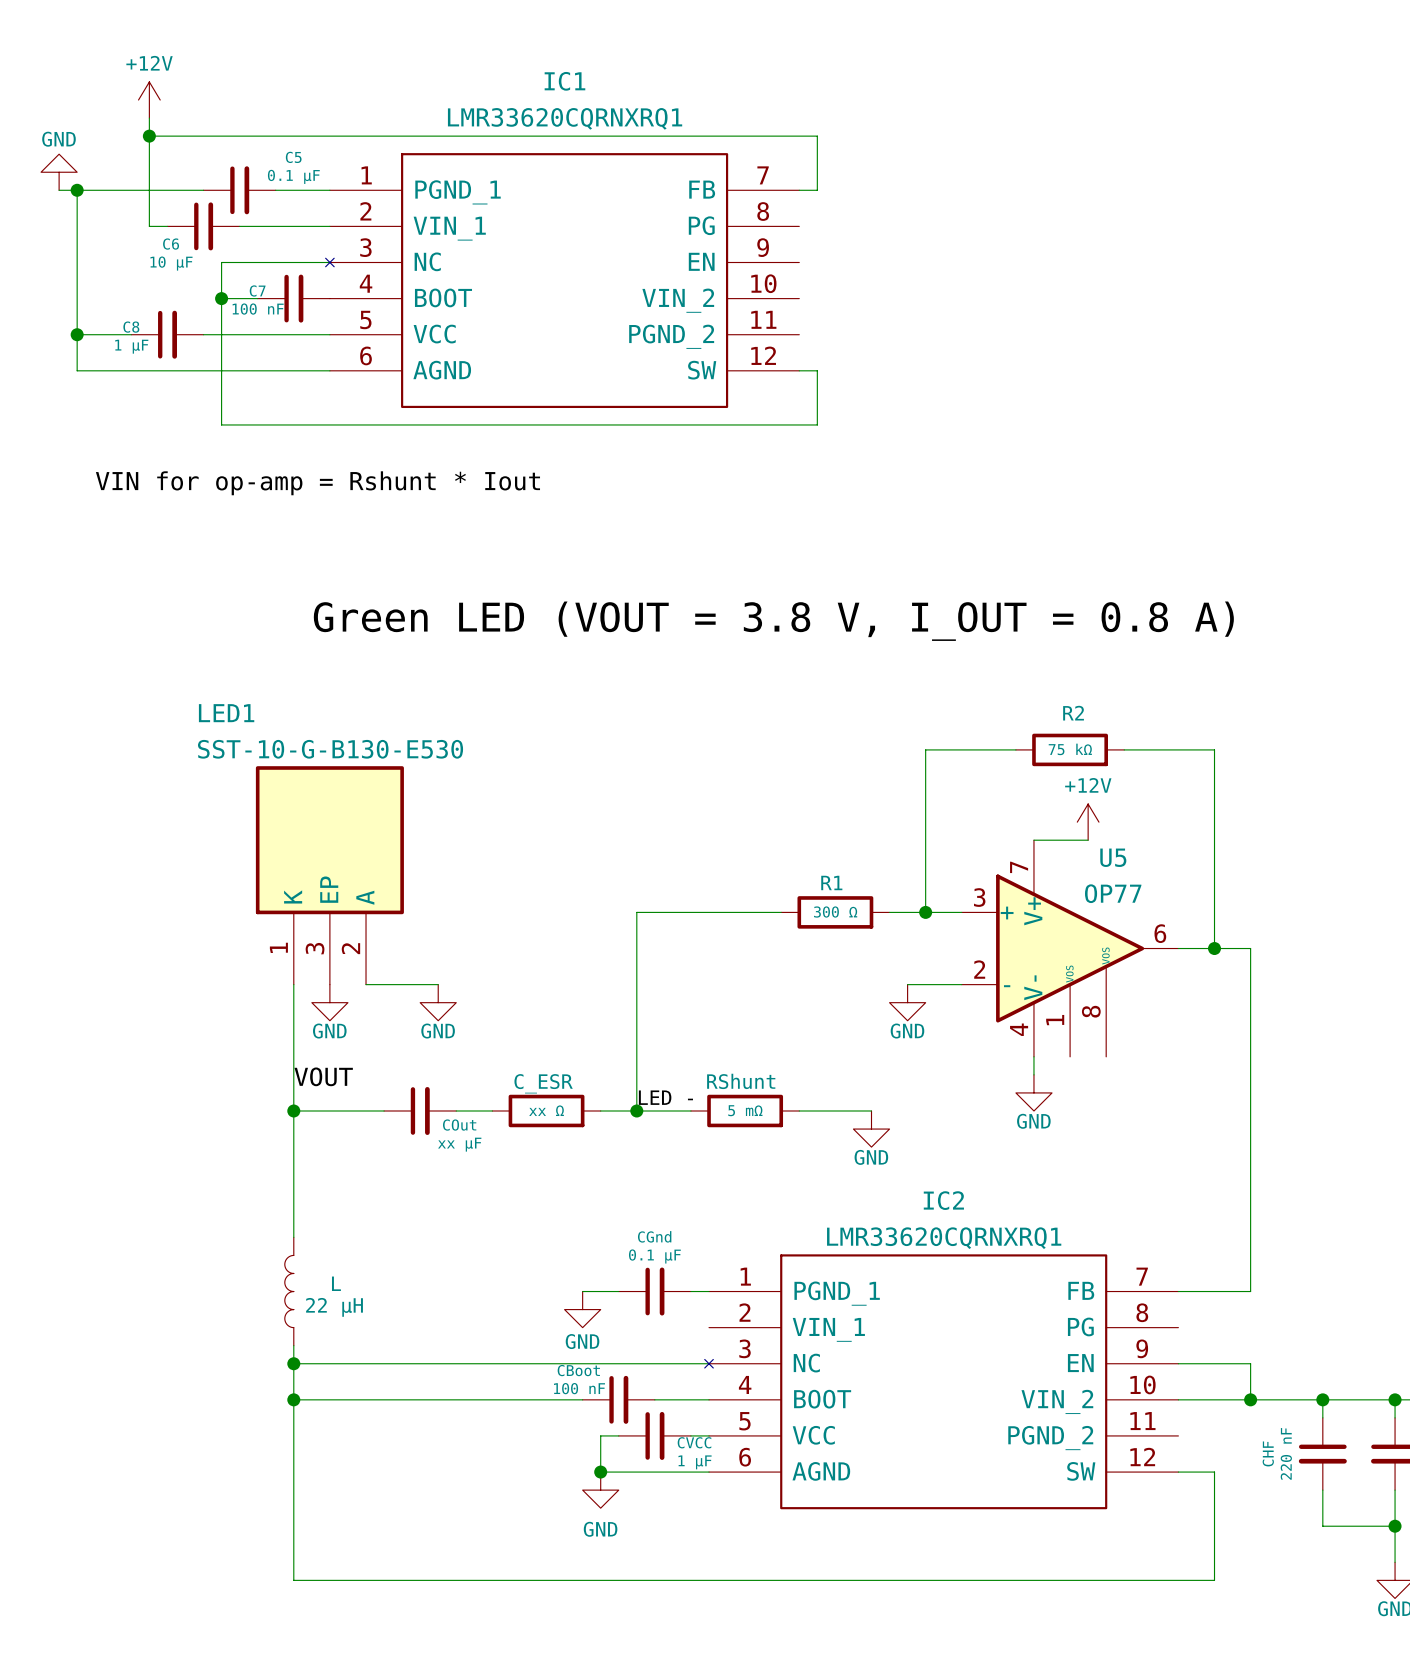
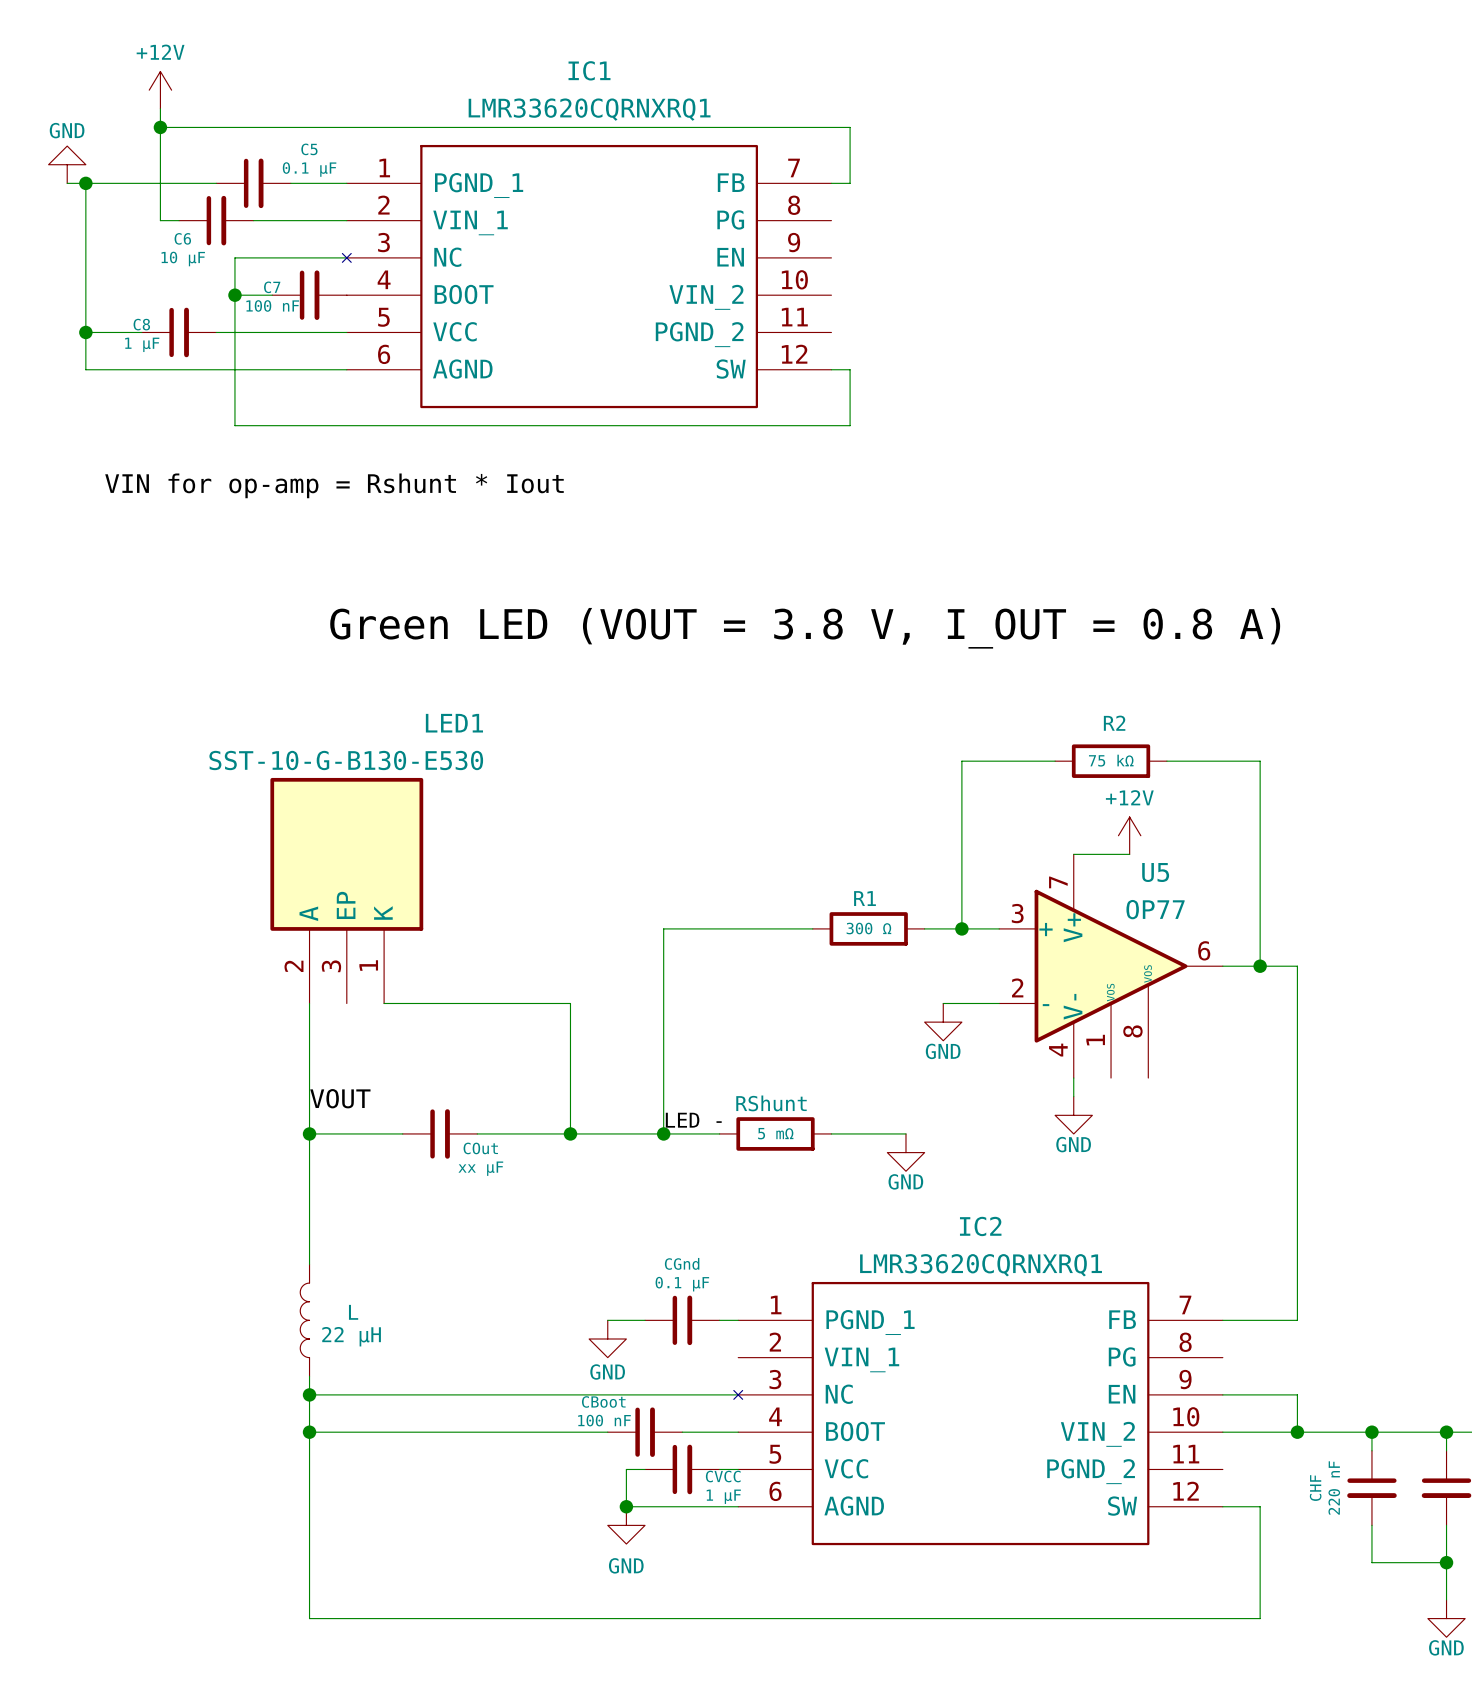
LED1 flip: as is (329, 840) -> left-right (346, 854)
wire: none -> (458, 1003) (570, 1003) (570, 1133)
power symbol: GND (329, 1002) -> none
power symbol: GND (438, 1002) -> none
wire: none -> (514, 1133) (626, 1133)
C_ESR: xx Ω (546, 1110) -> none
junction: none -> (570, 1133)

